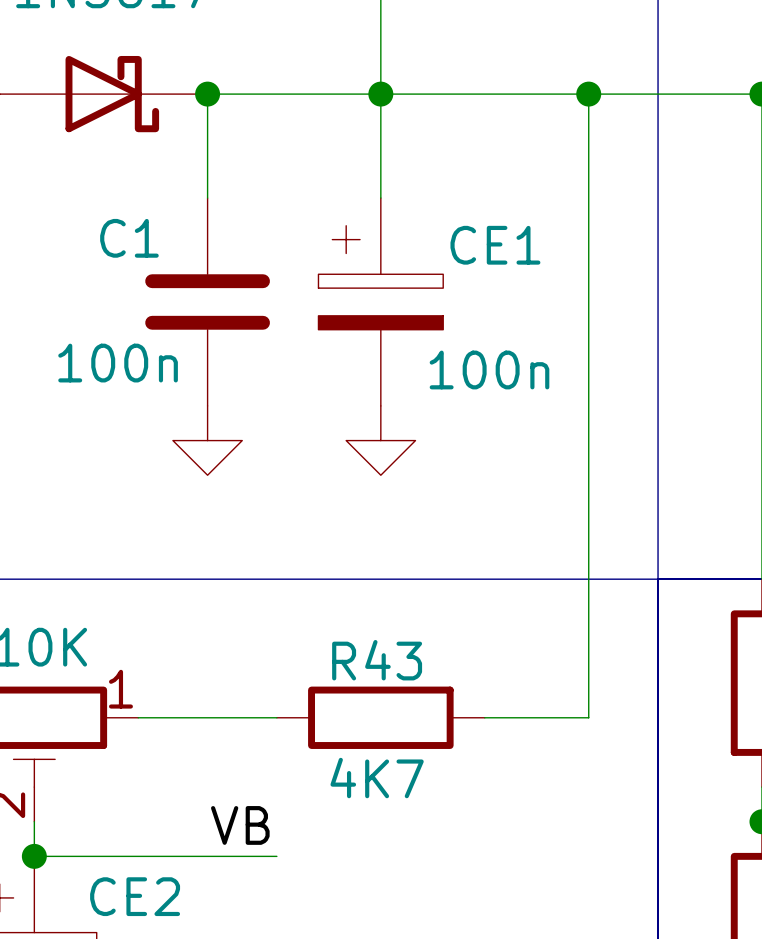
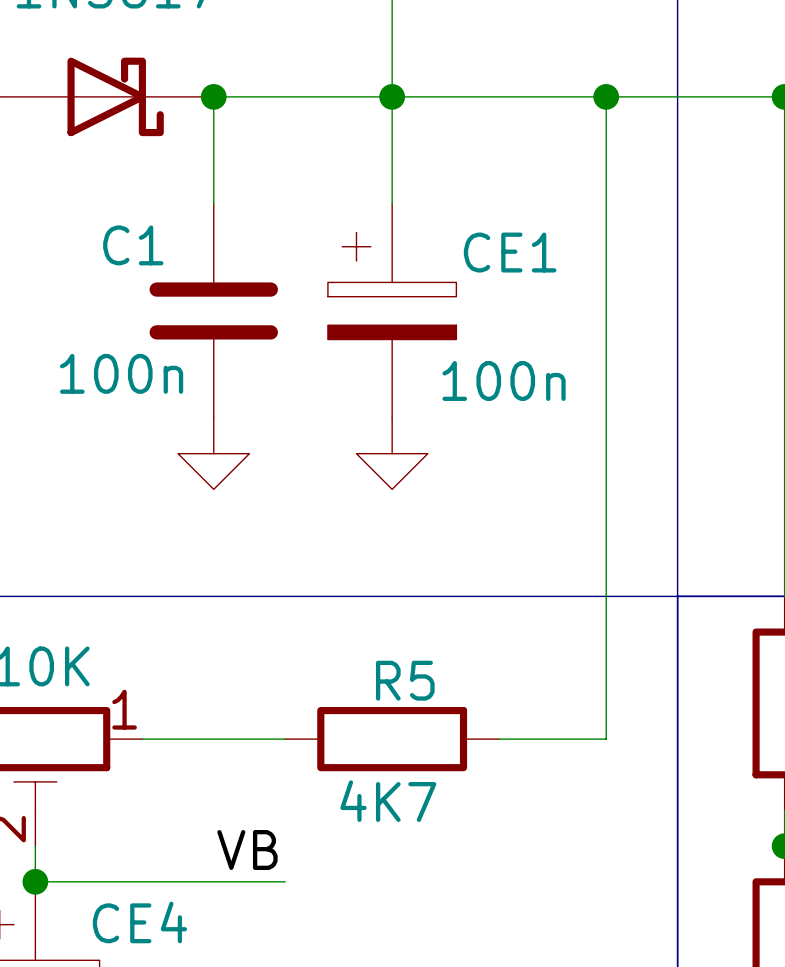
R43 name: R43 (377, 660) -> R5 (405, 680)
CE2 name: CE2 (135, 896) -> CE4 (139, 922)

